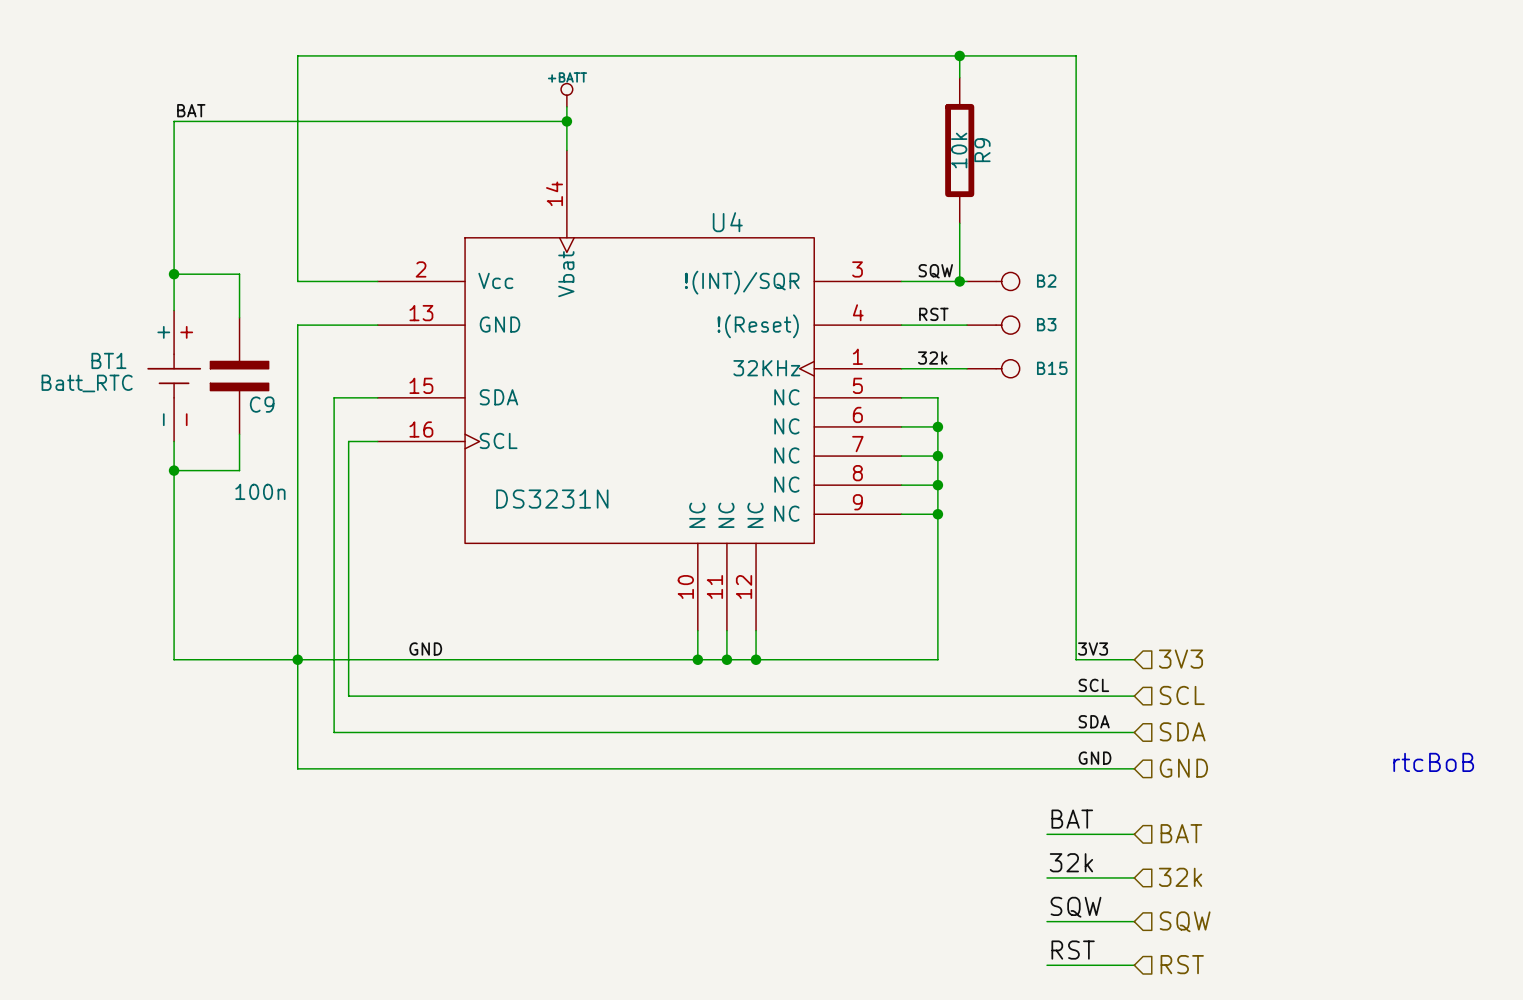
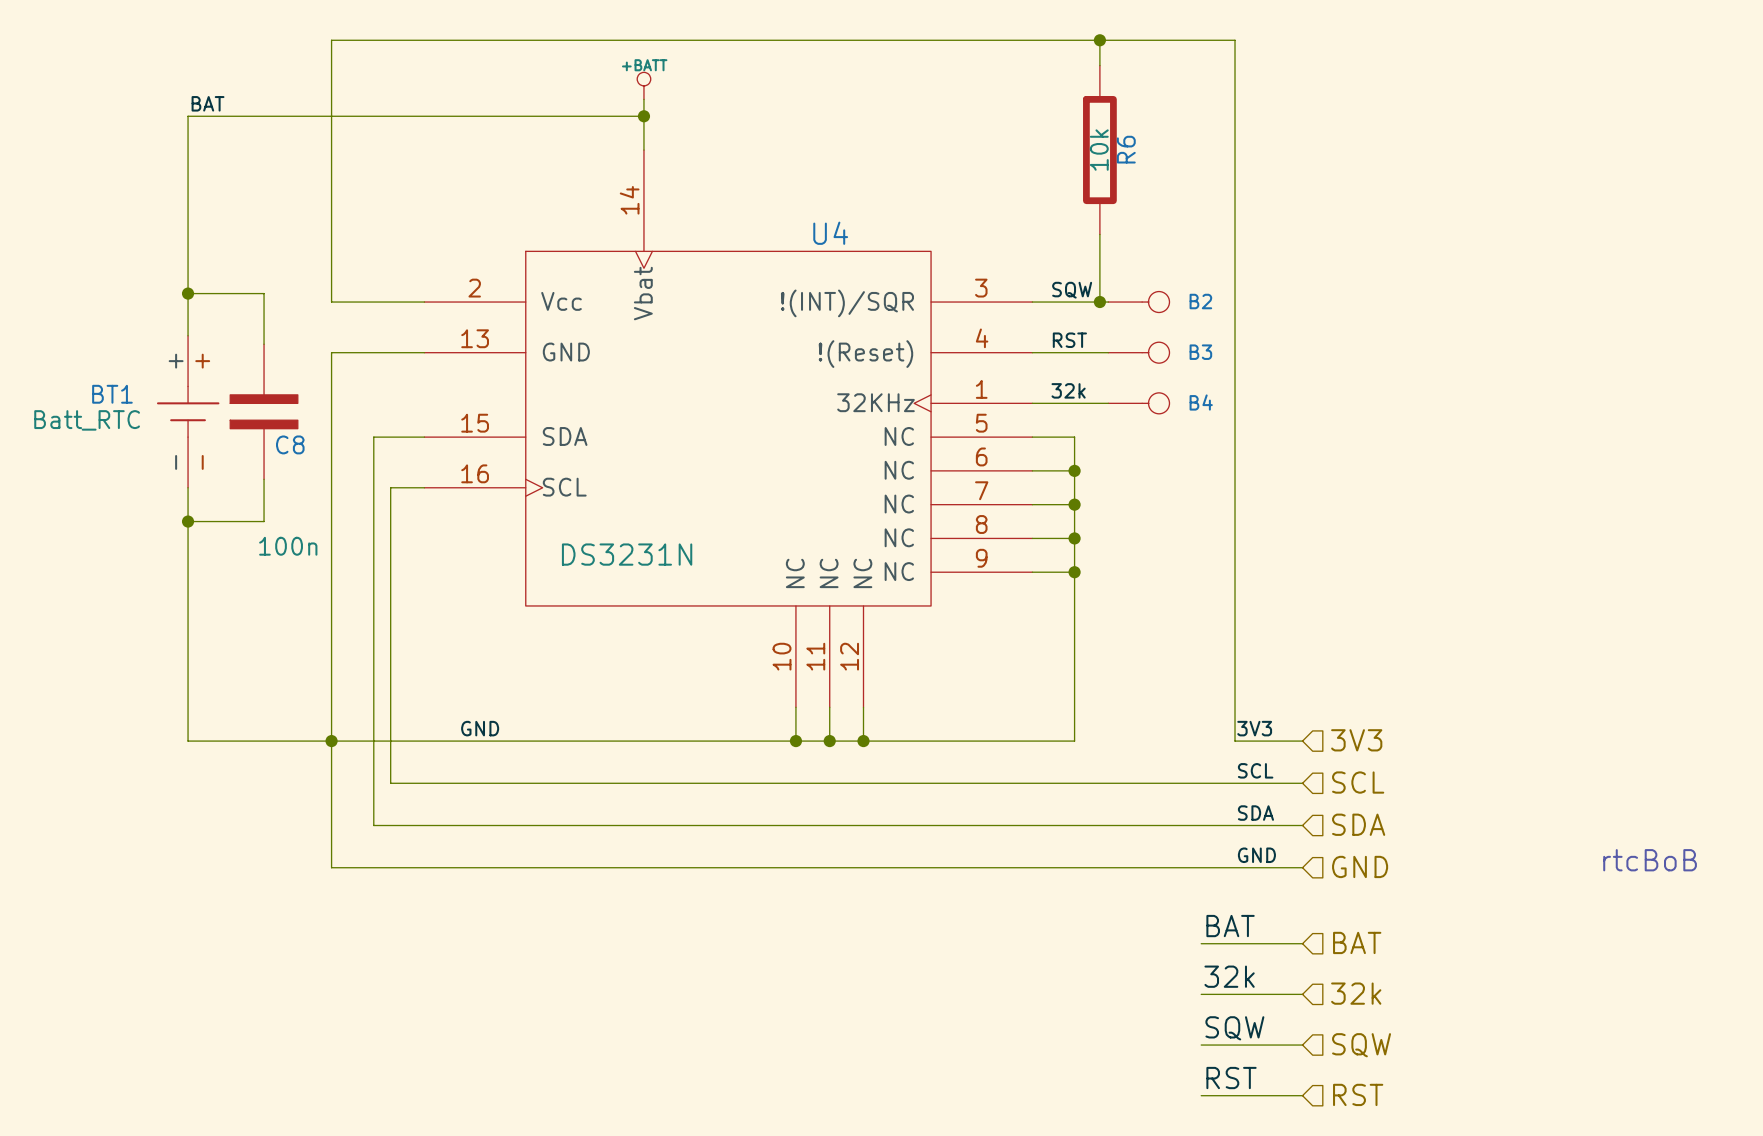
R9 name: R9 (982, 150) -> R6 (1126, 149)
B15 name: B15 (1052, 368) -> B4 (1201, 402)
C9 name: C9 (262, 404) -> C8 (290, 444)

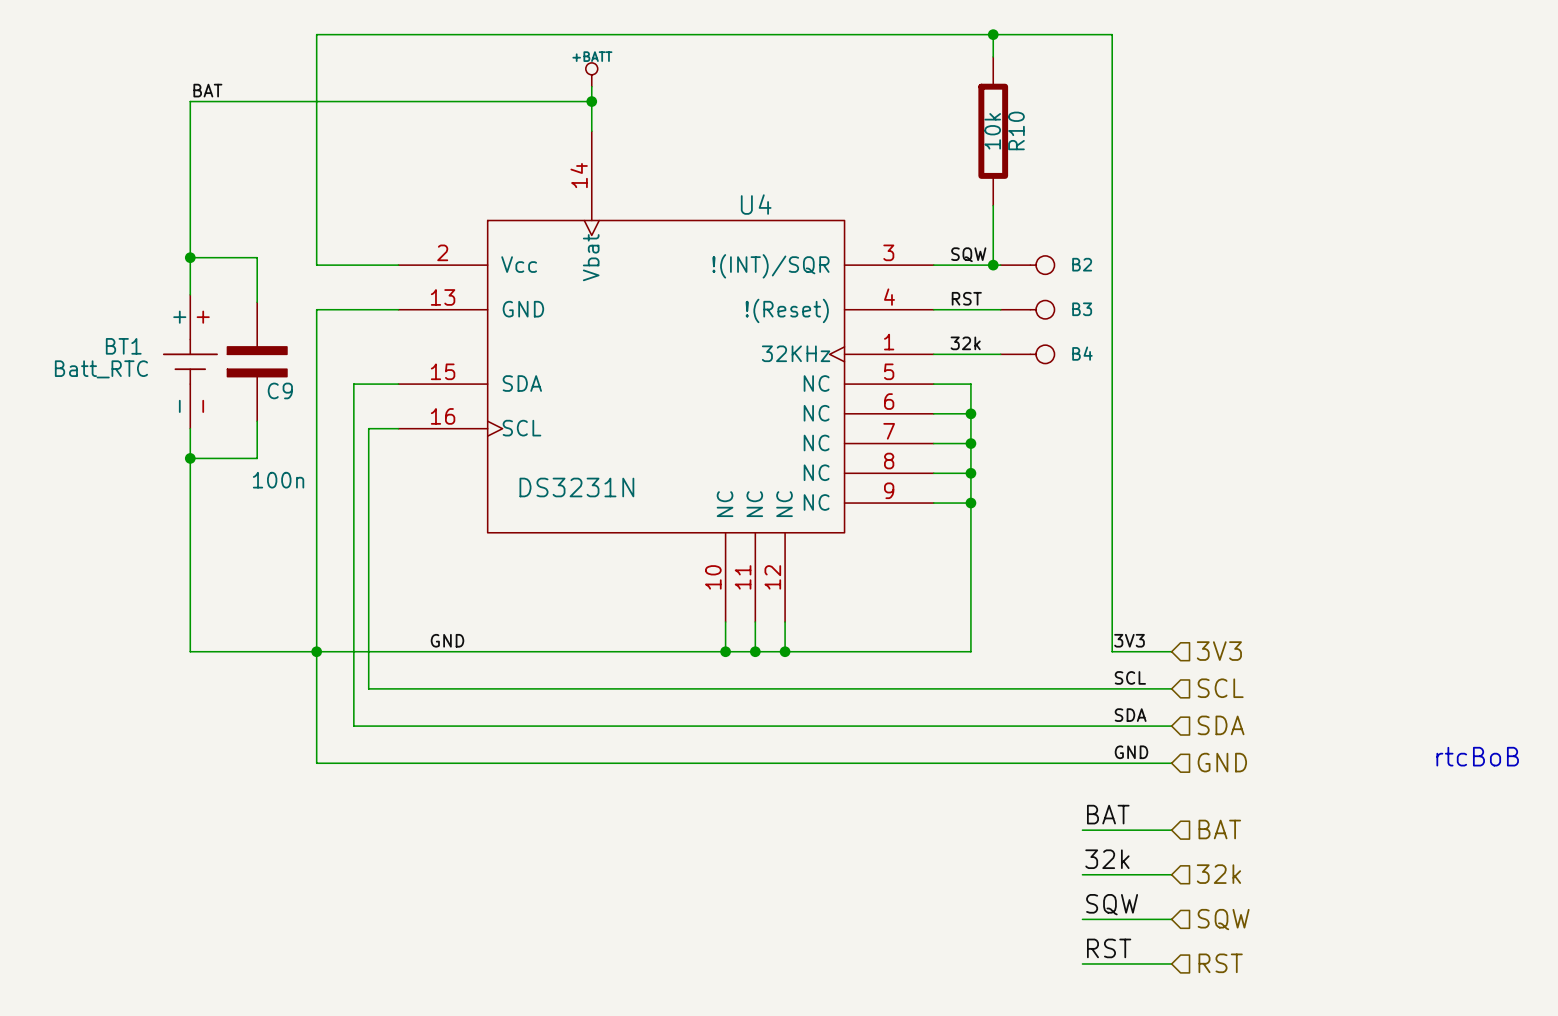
R6 name: R6 (1126, 149) -> R10 (1016, 130)
C8 name: C8 (290, 444) -> C9 (280, 390)

